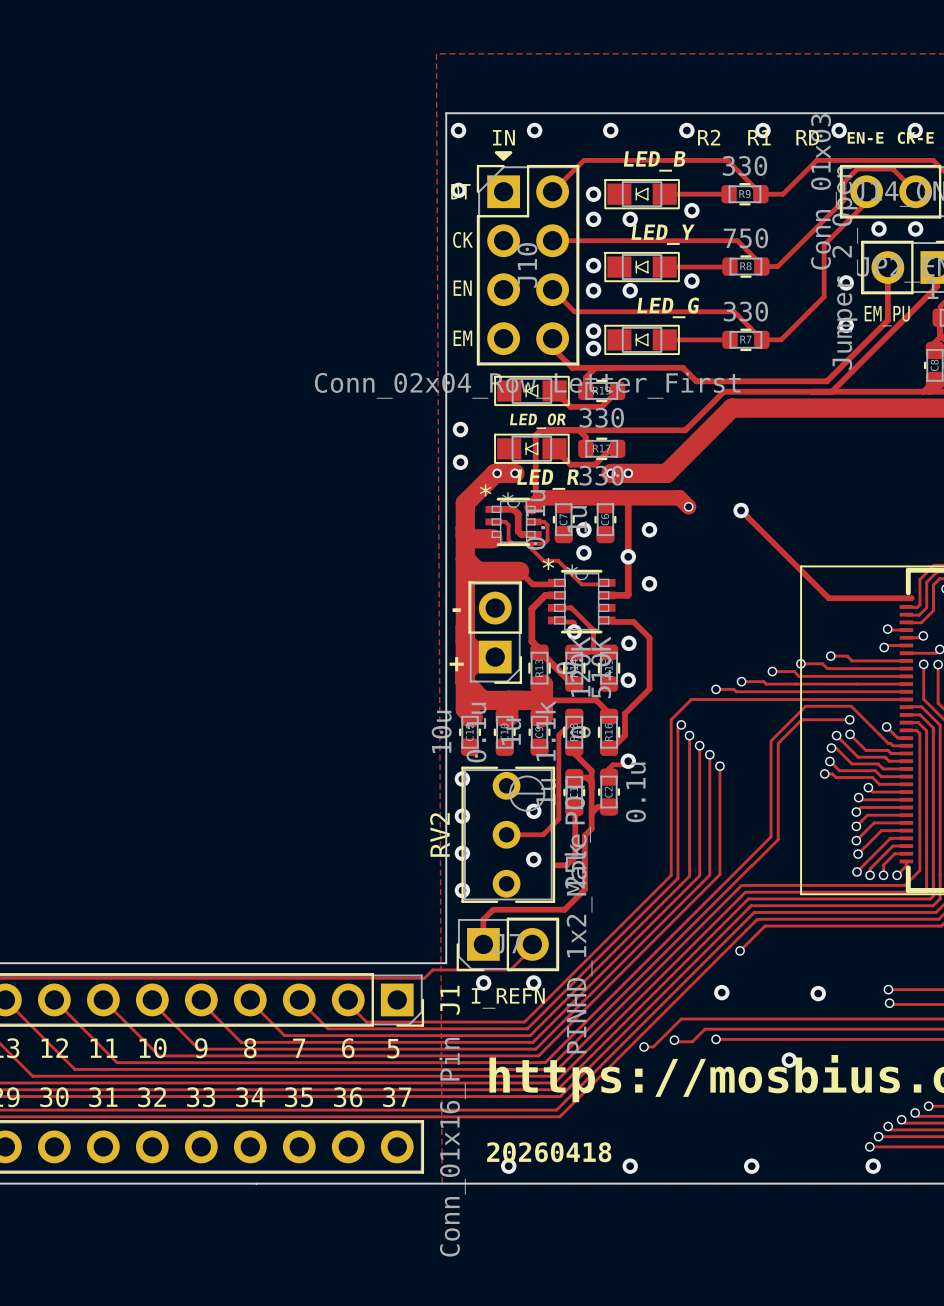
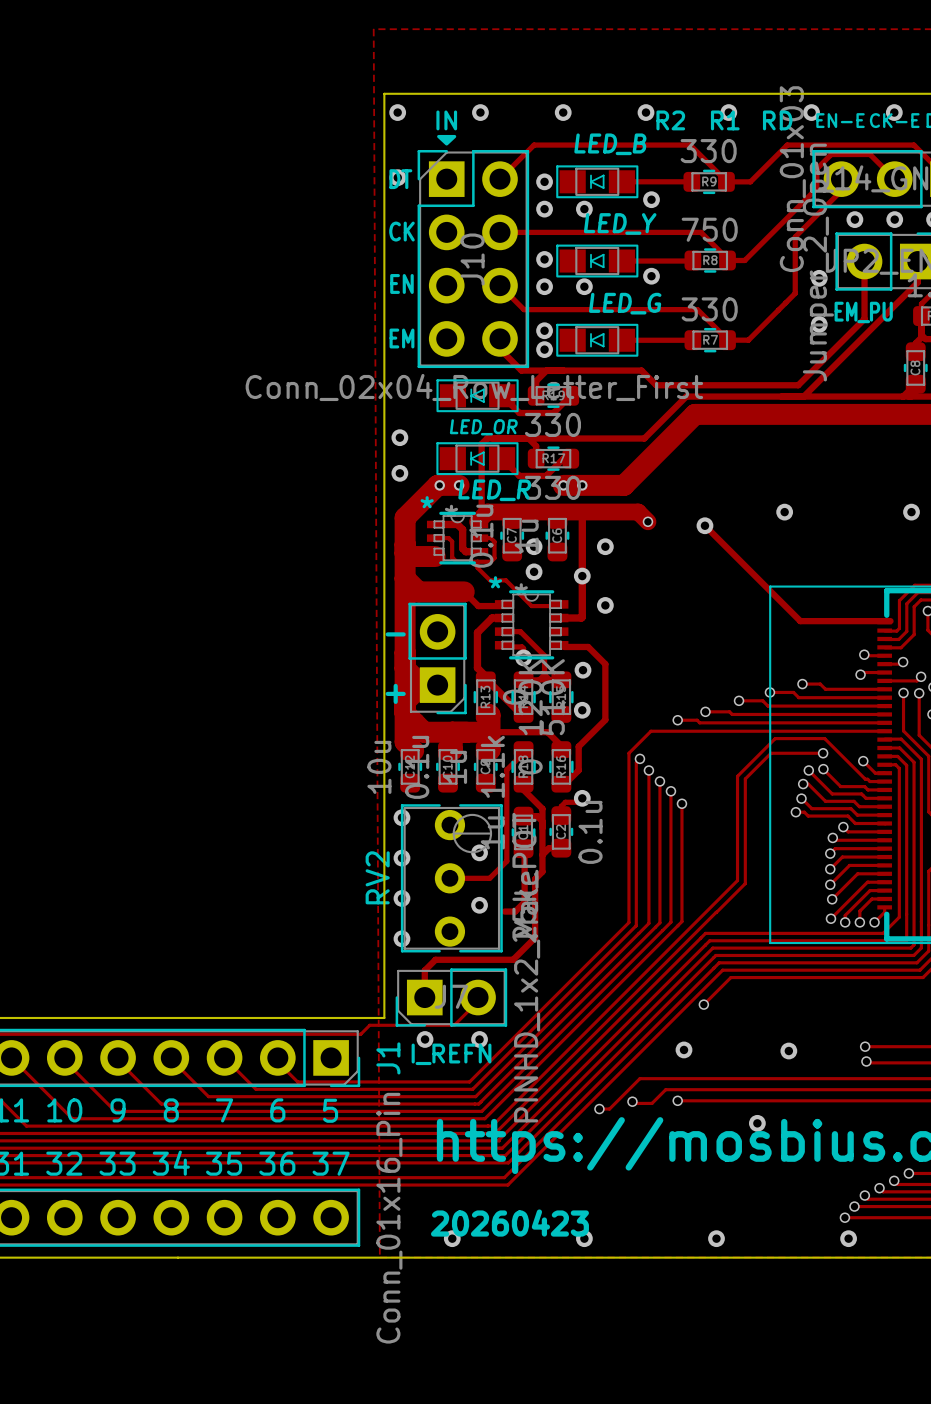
via: none -> (784, 512)
via: none -> (911, 512)
text: 20260418 (549, 1152) -> 20260423 (509, 1223)

